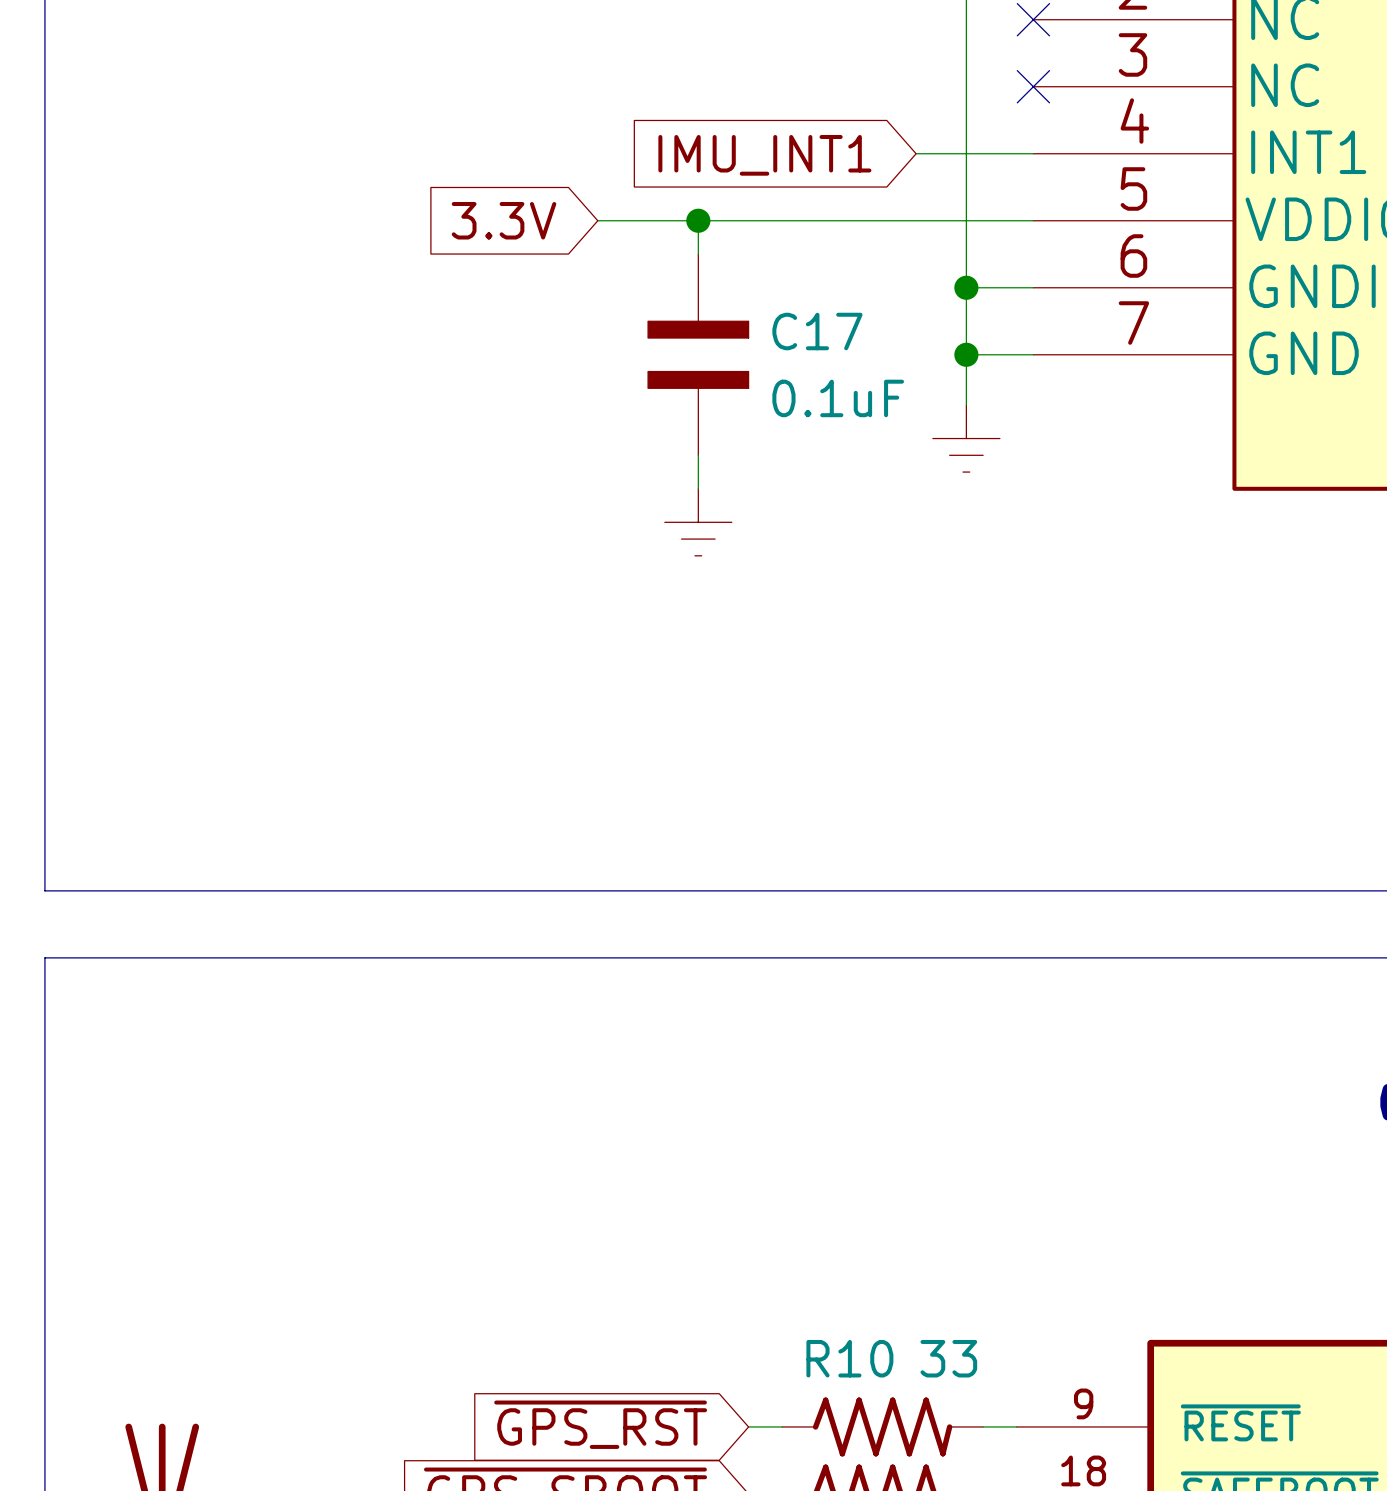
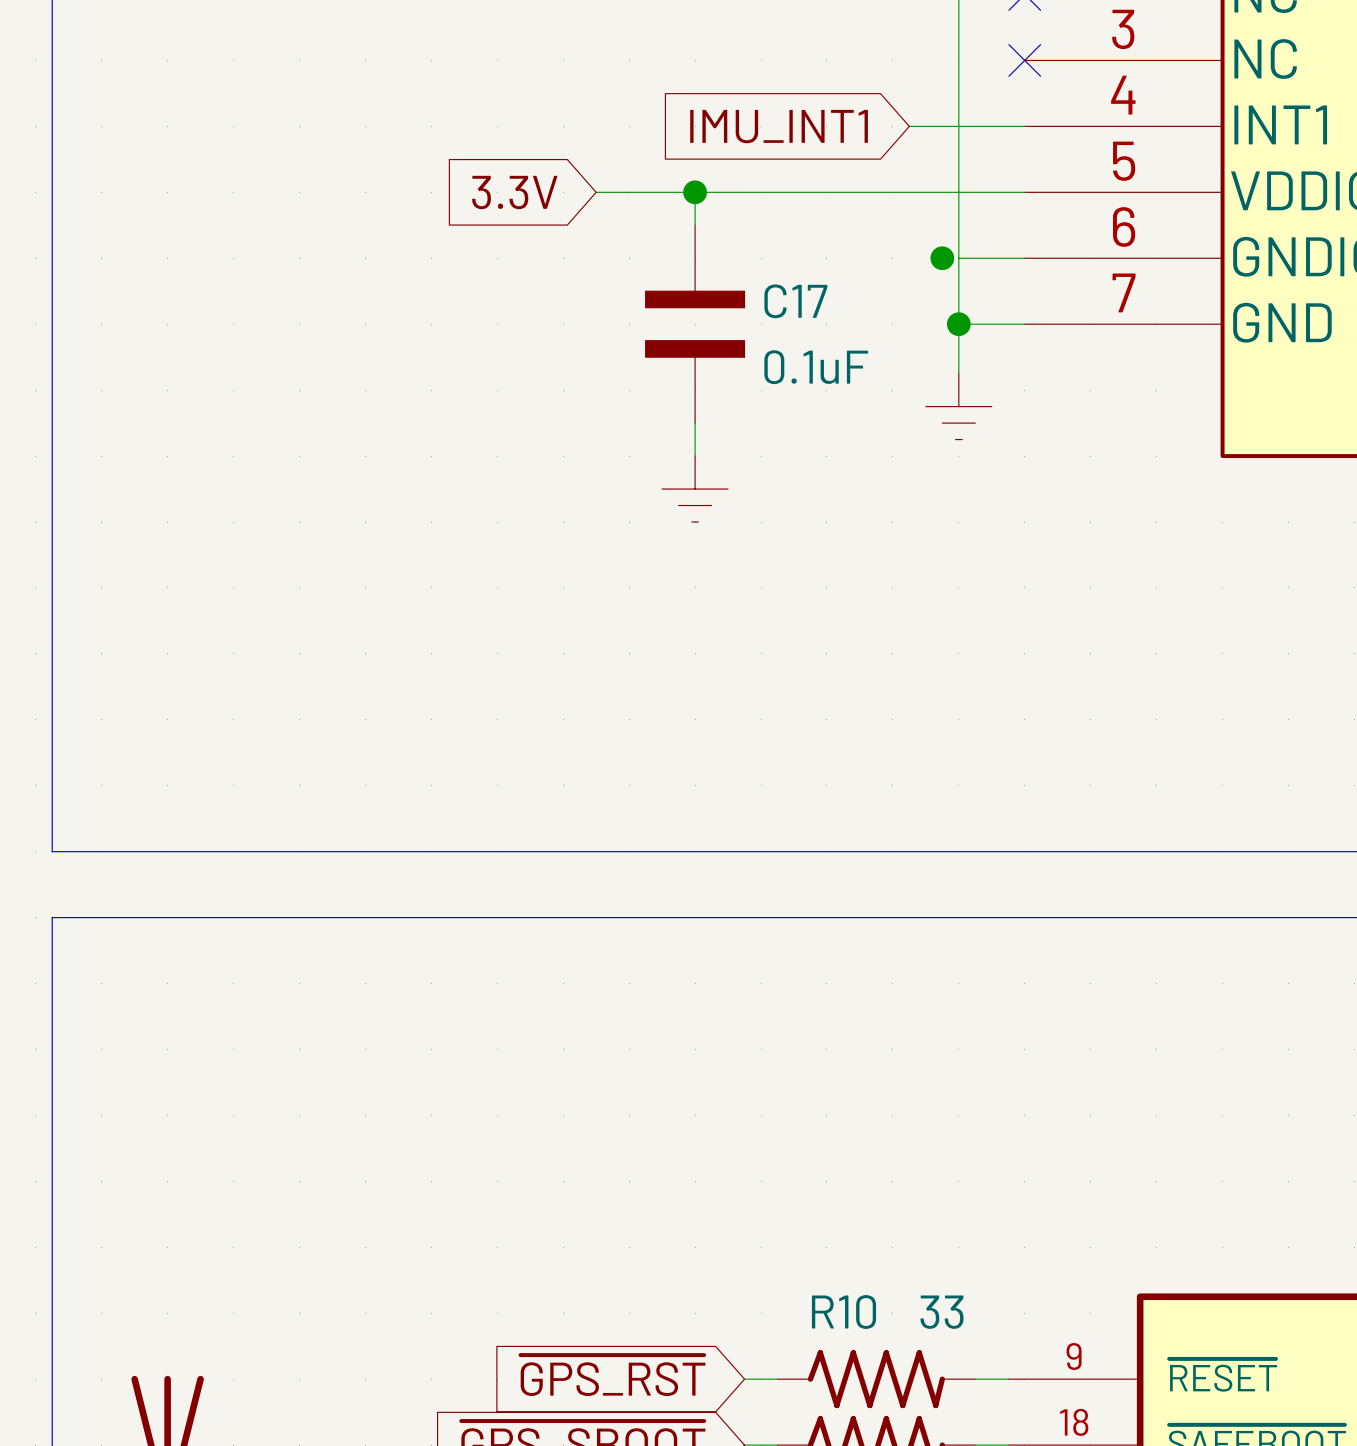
junction position: (966, 287) -> (942, 258)

